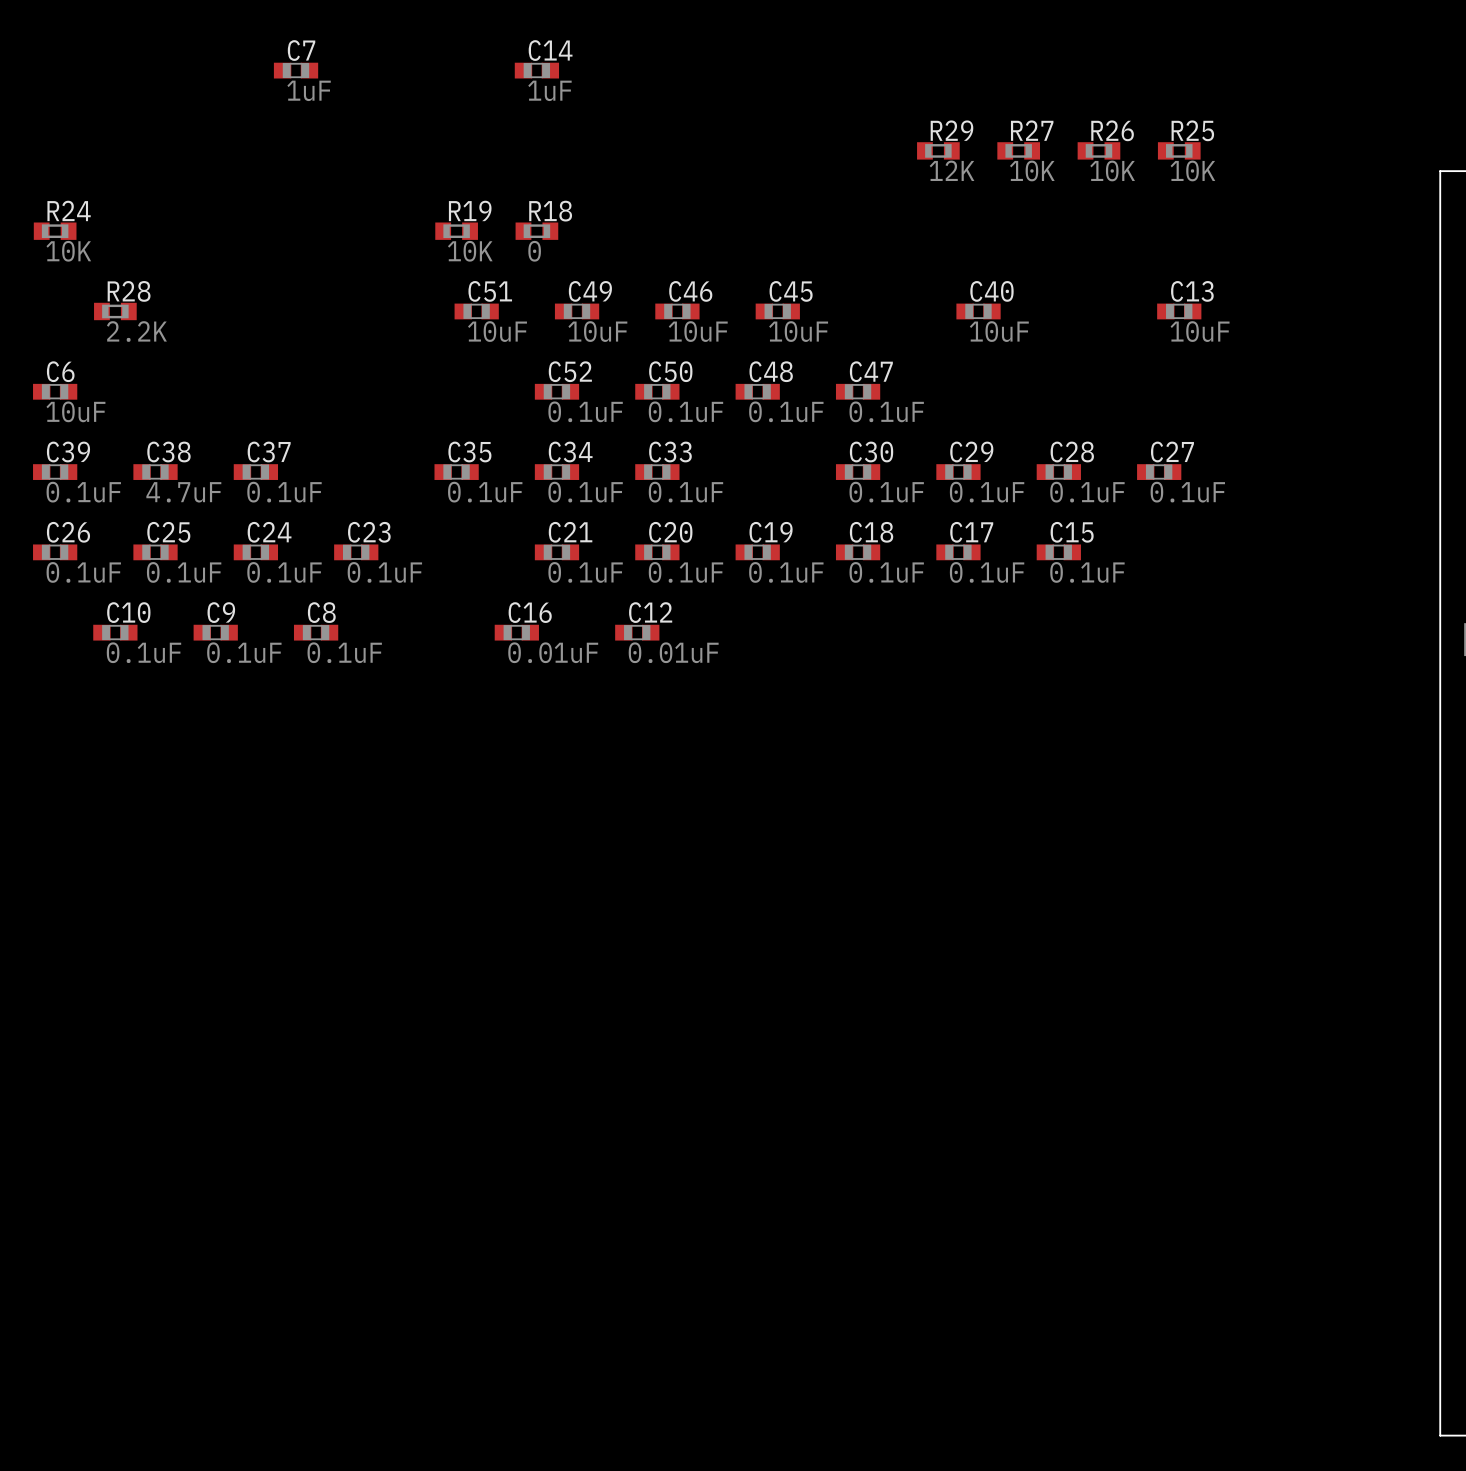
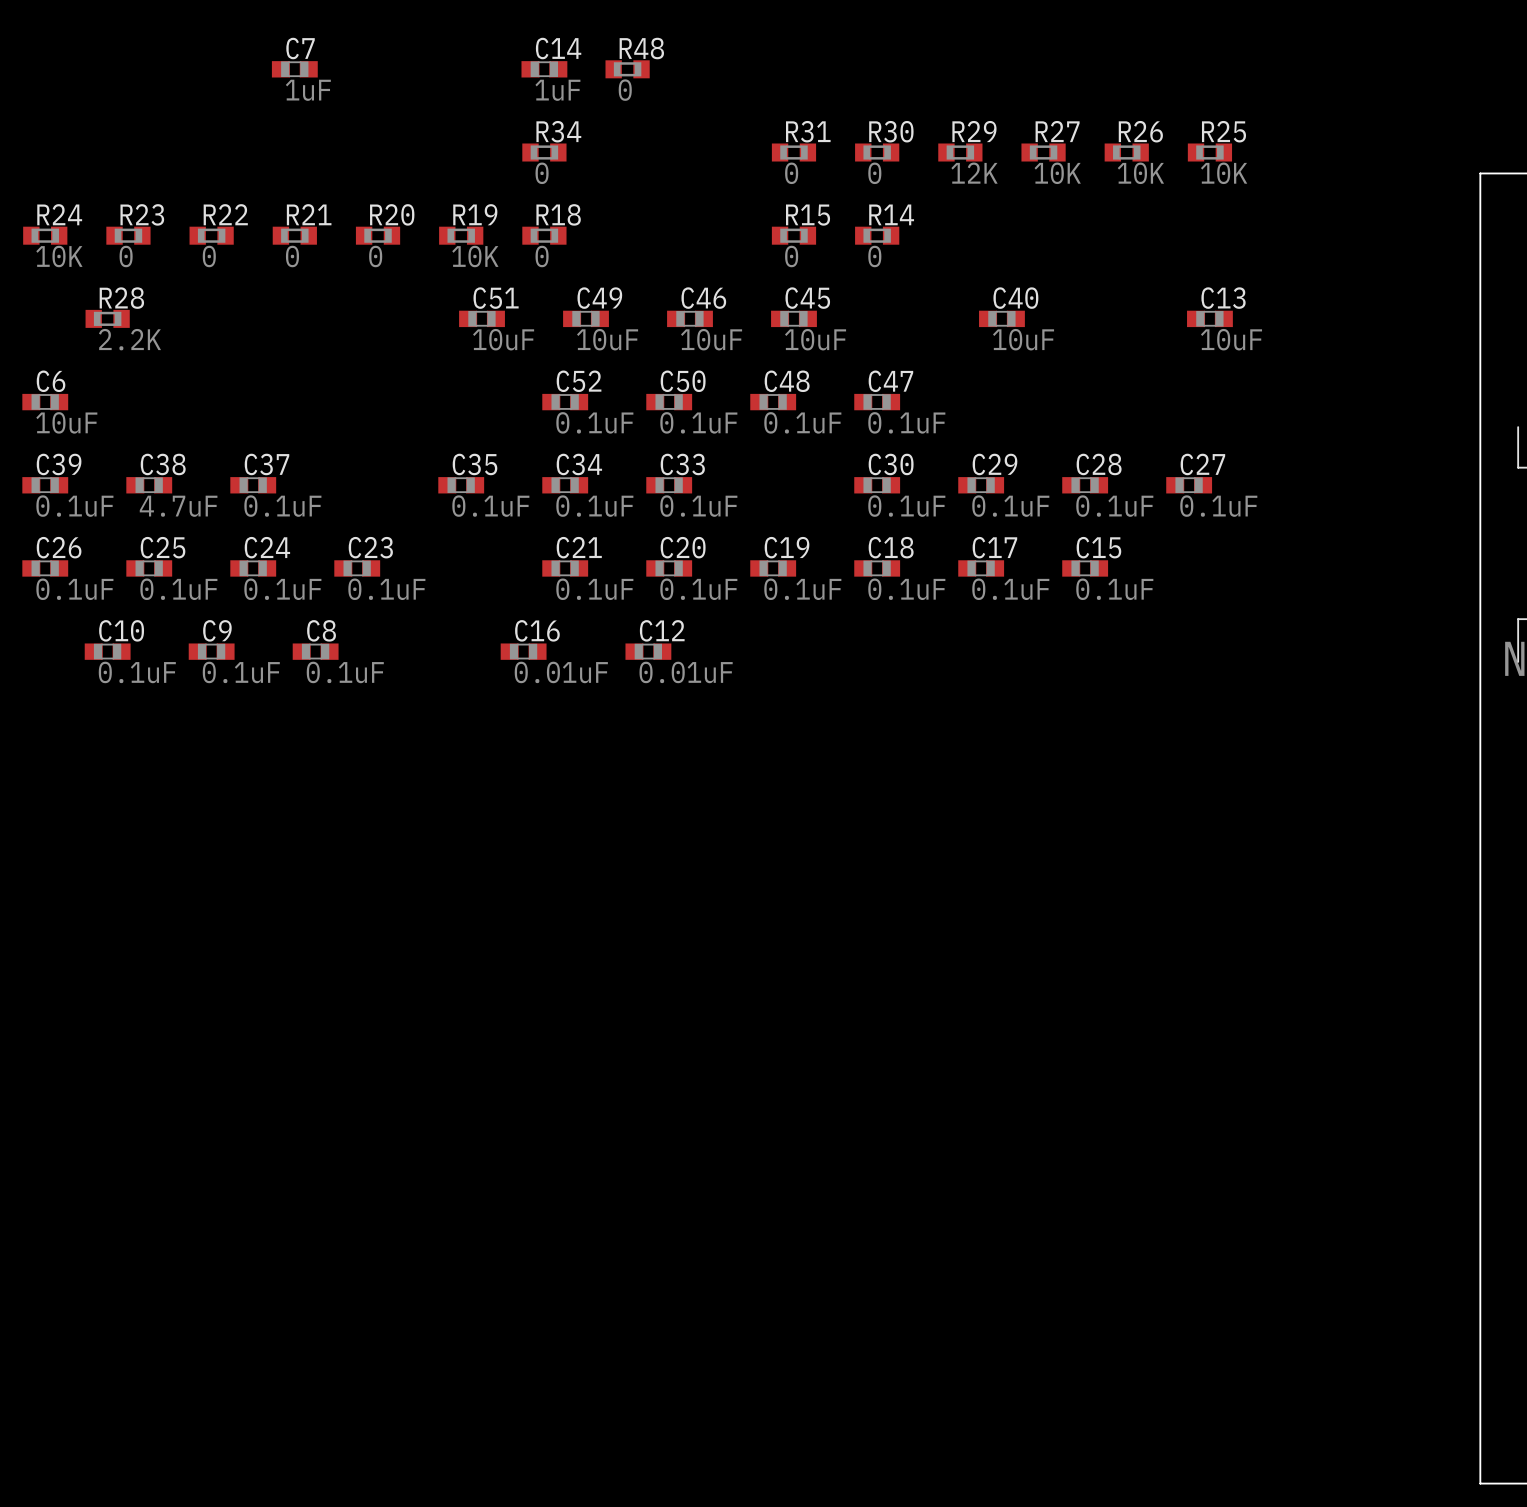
R48: none -> 0 (627, 69)
R34: none -> 0 (544, 152)
R31: none -> 0 (793, 152)
R30: none -> 0 (877, 152)
R23: none -> 0 (128, 235)
R22: none -> 0 (211, 235)
R21: none -> 0 (294, 235)
R20: none -> 0 (378, 235)
R15: none -> 0 (793, 235)
R14: none -> 0 (877, 235)

